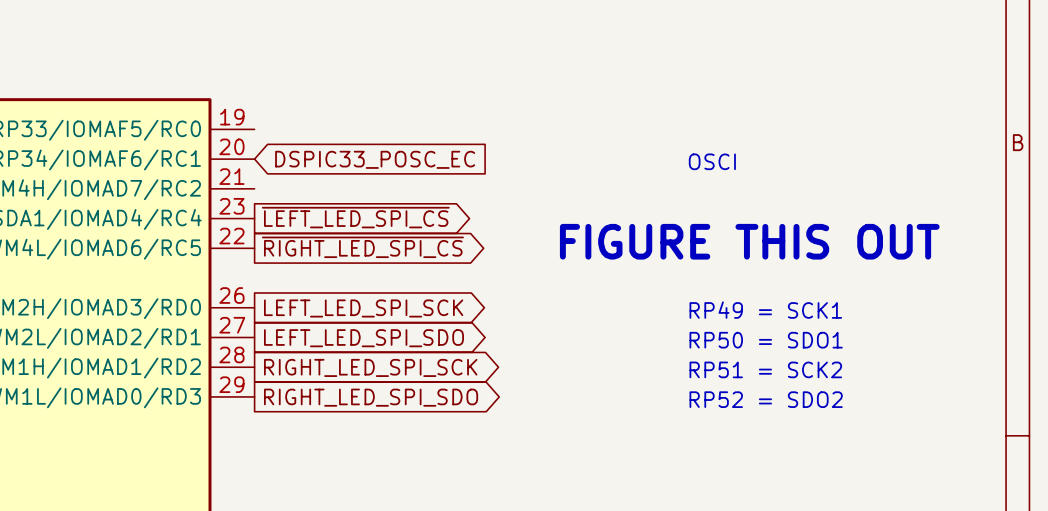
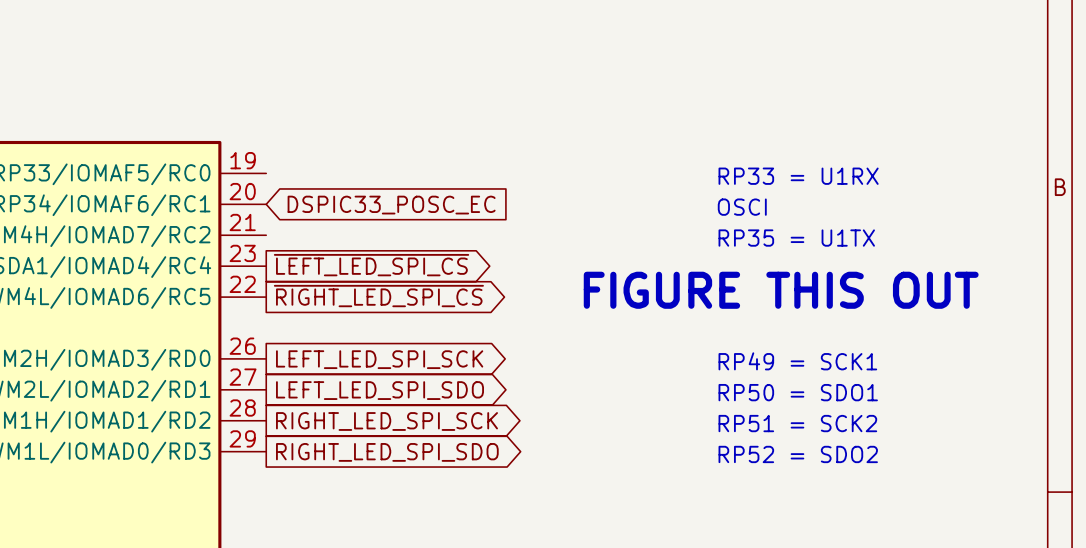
text: none -> RP33 = U1RX (798, 176)
text: none -> RP35 = U1TX (796, 238)

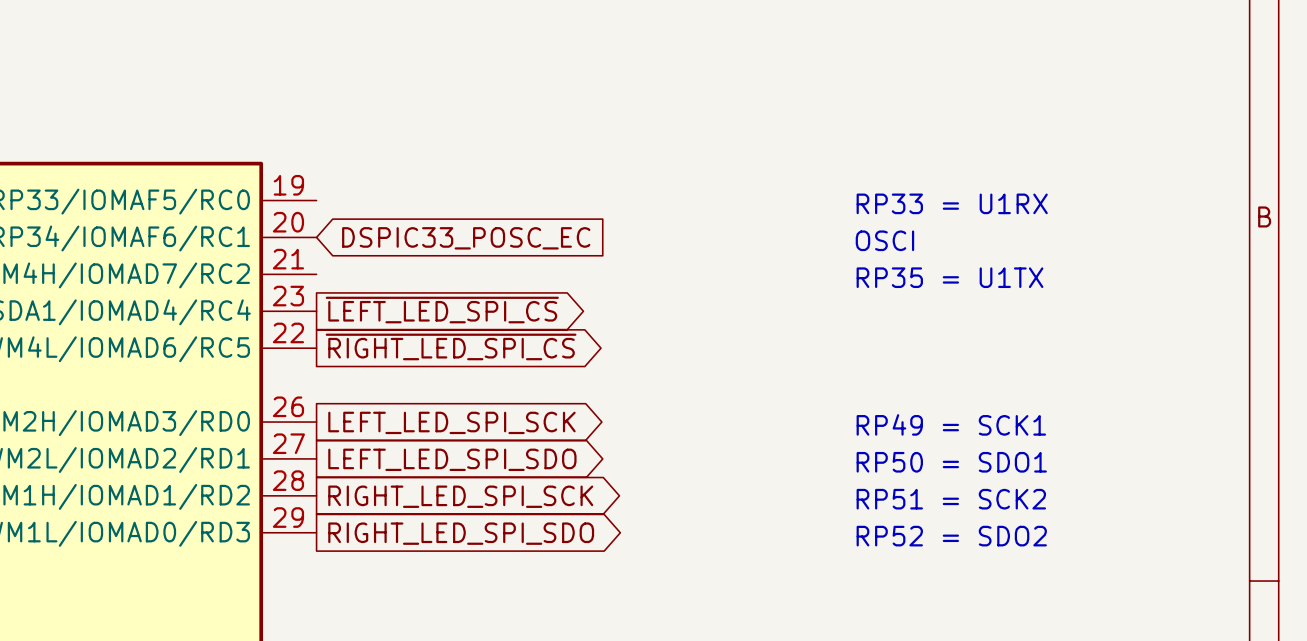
text: FIGURE THIS OUT (781, 290) -> none

